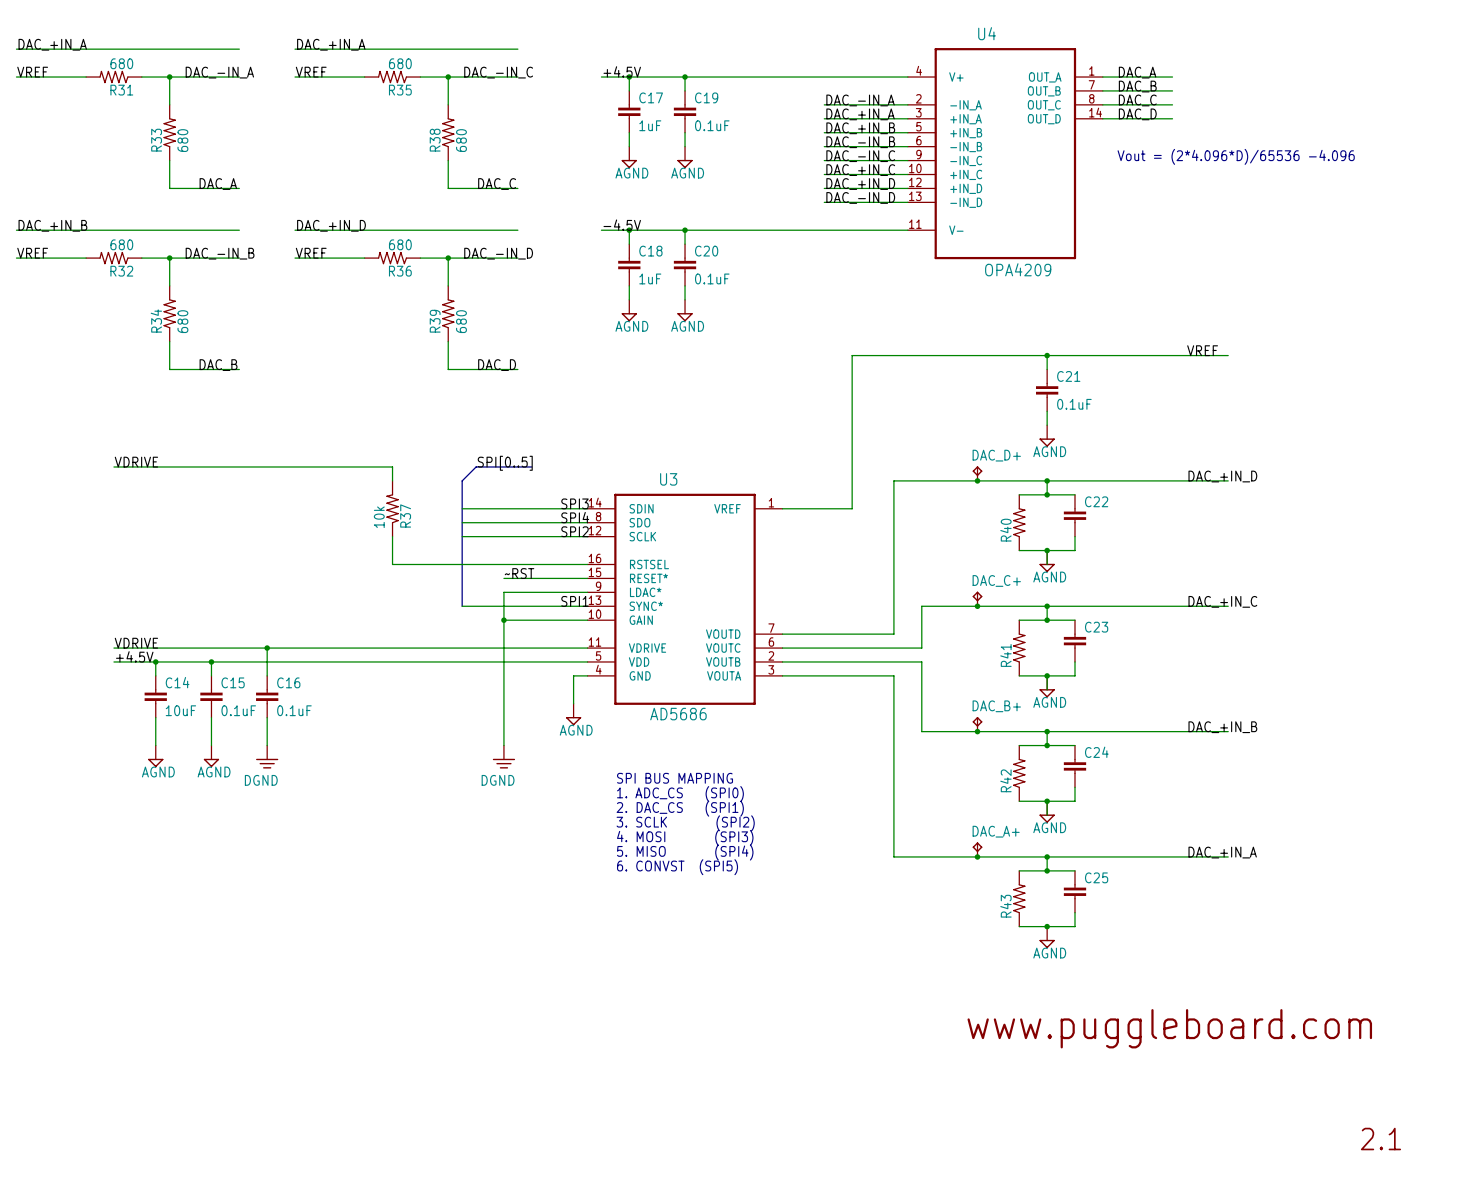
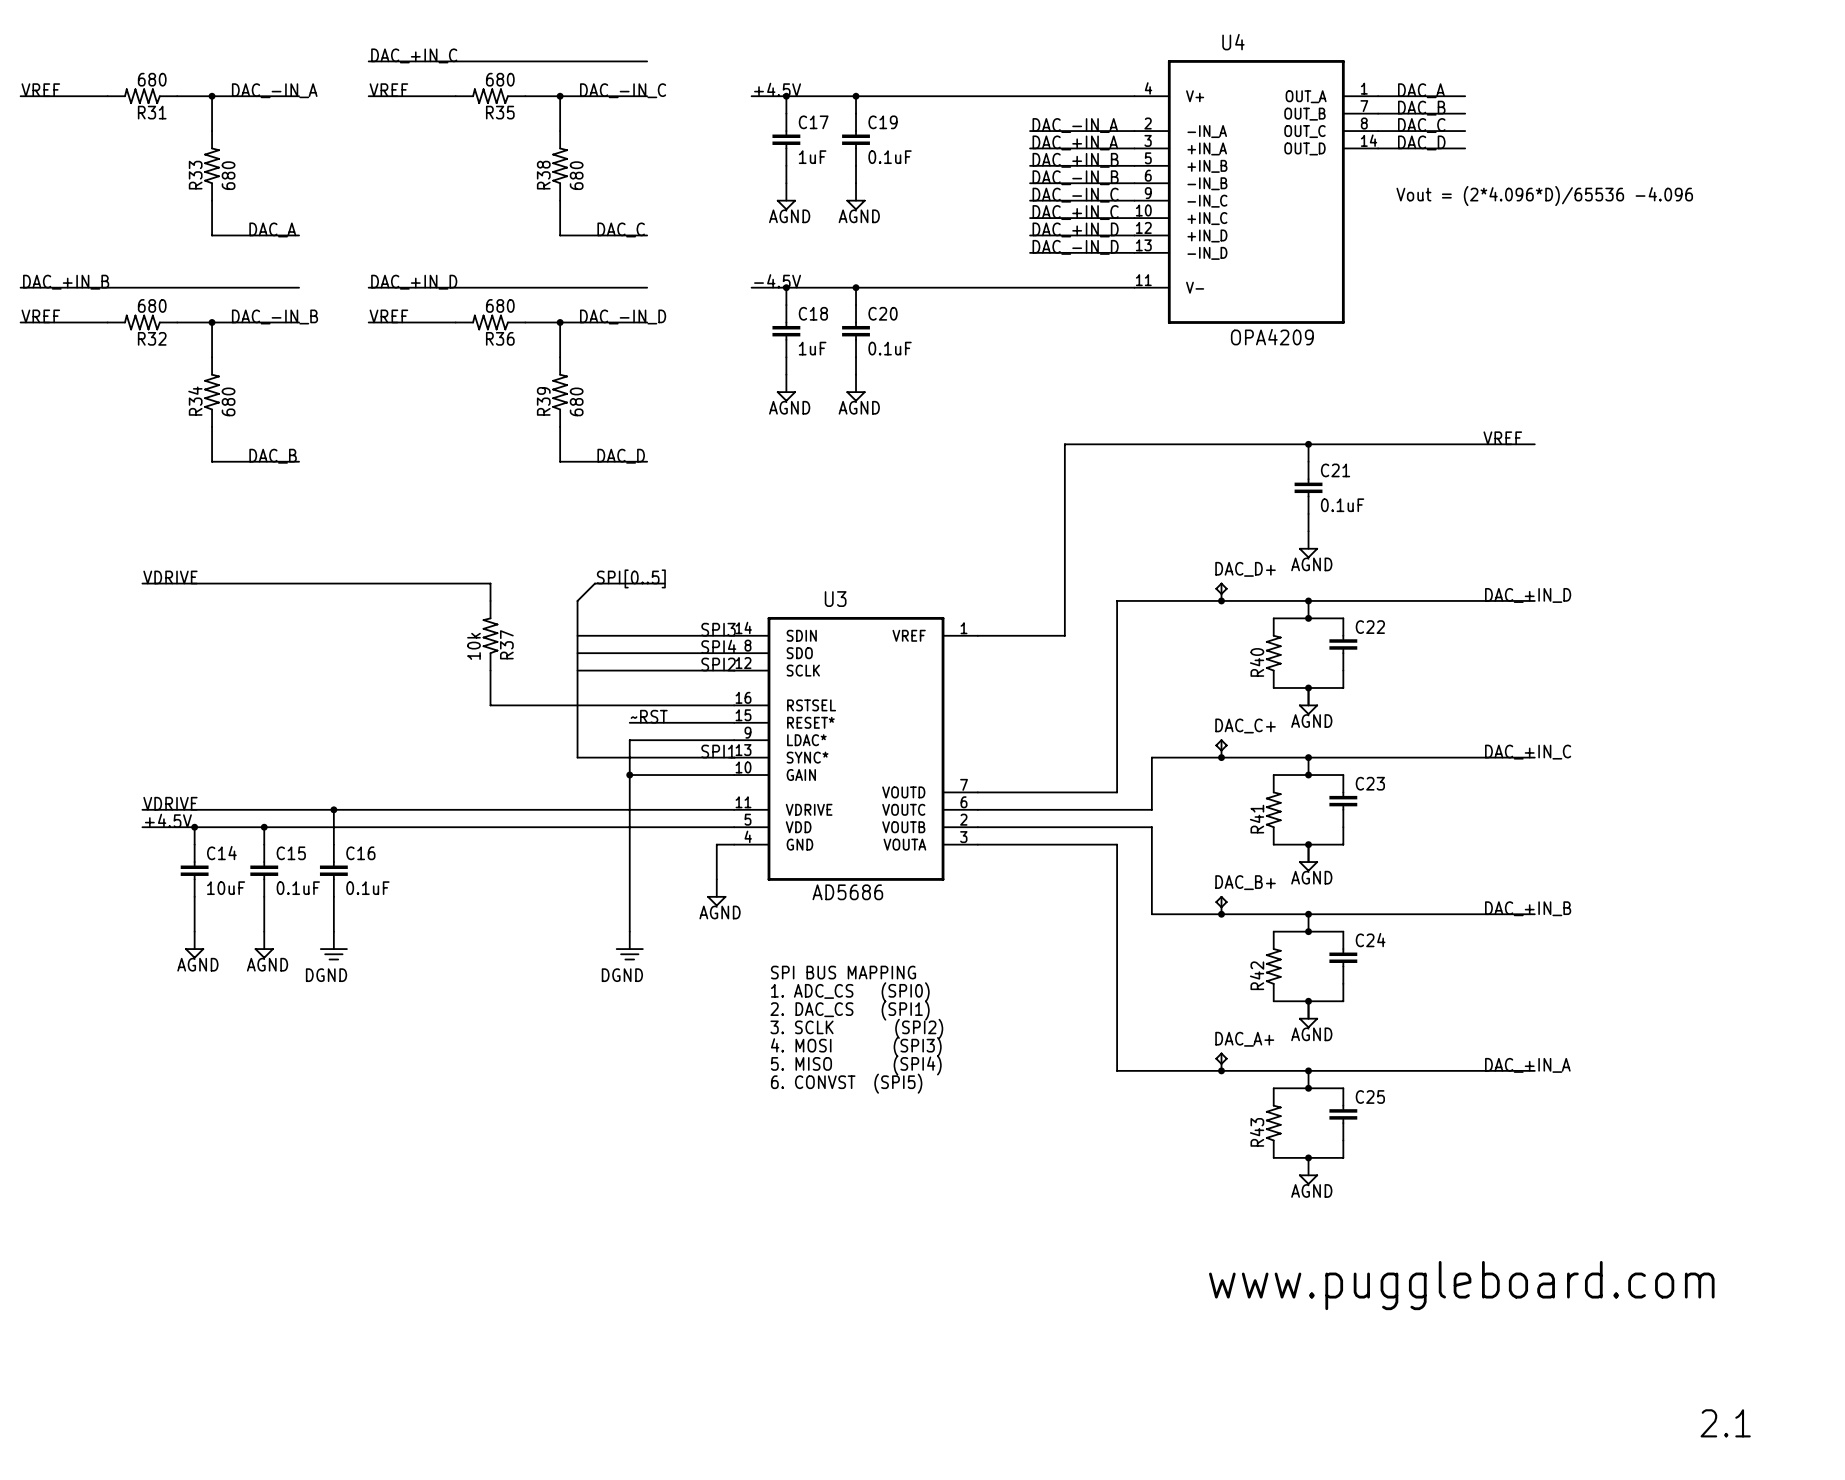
label: DAC_+IN_A (52, 44) -> none
label: DAC_+IN_A (331, 44) -> DAC_+IN_C (414, 55)
wire: (16, 49) (239, 49) -> none

